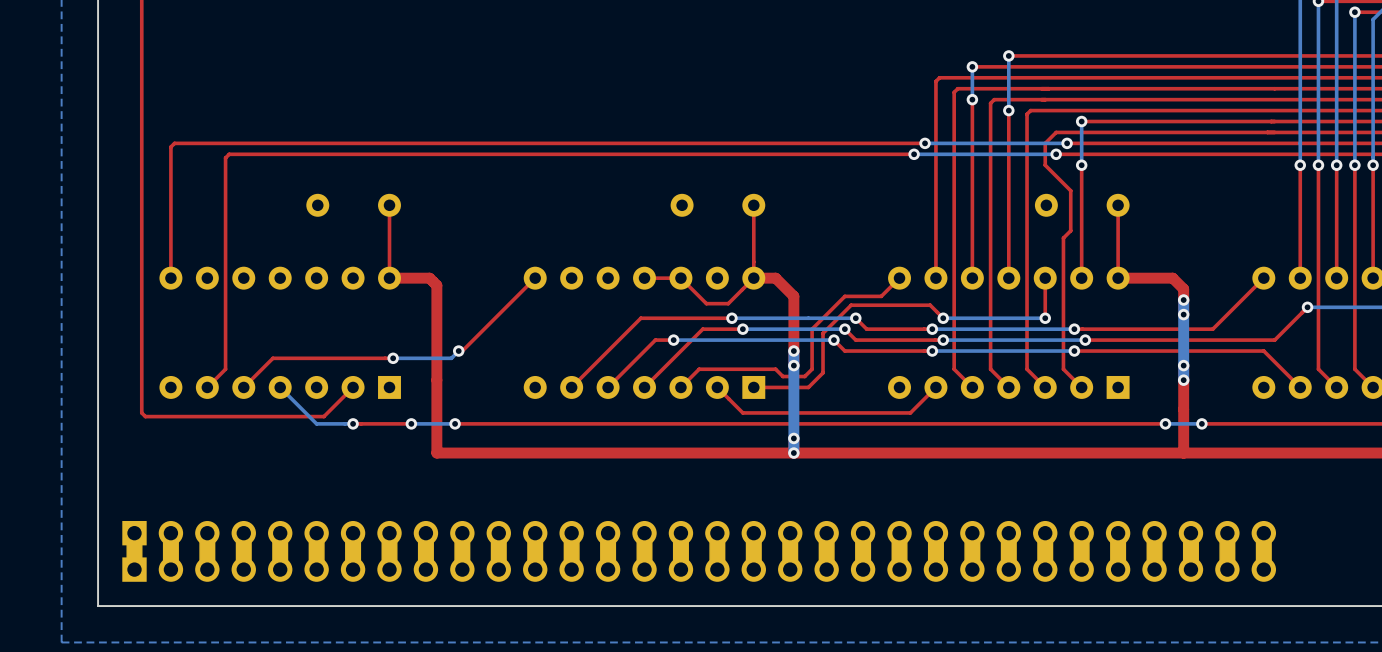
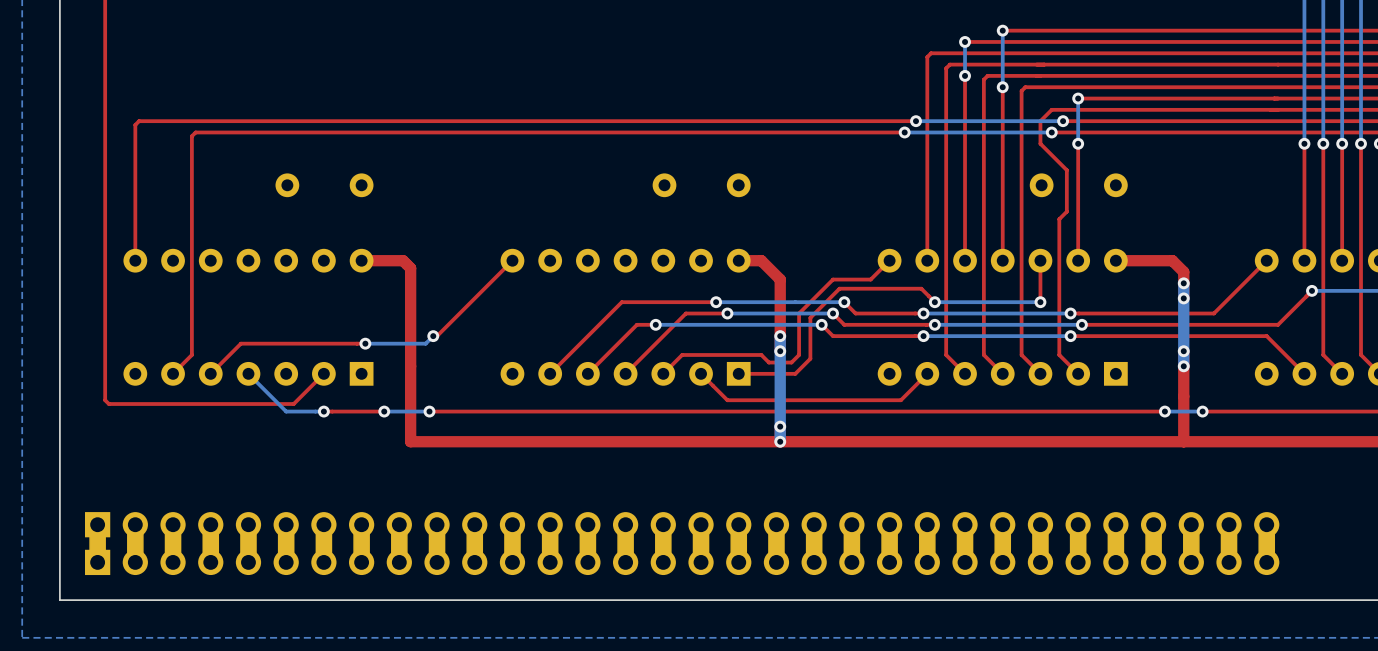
top track: (389, 205) (389, 278) -> none
top track: (753, 205) (753, 278) (728, 303) (706, 303) (680, 278) (644, 278) -> none
top track: (1118, 205) (1118, 278) -> none

